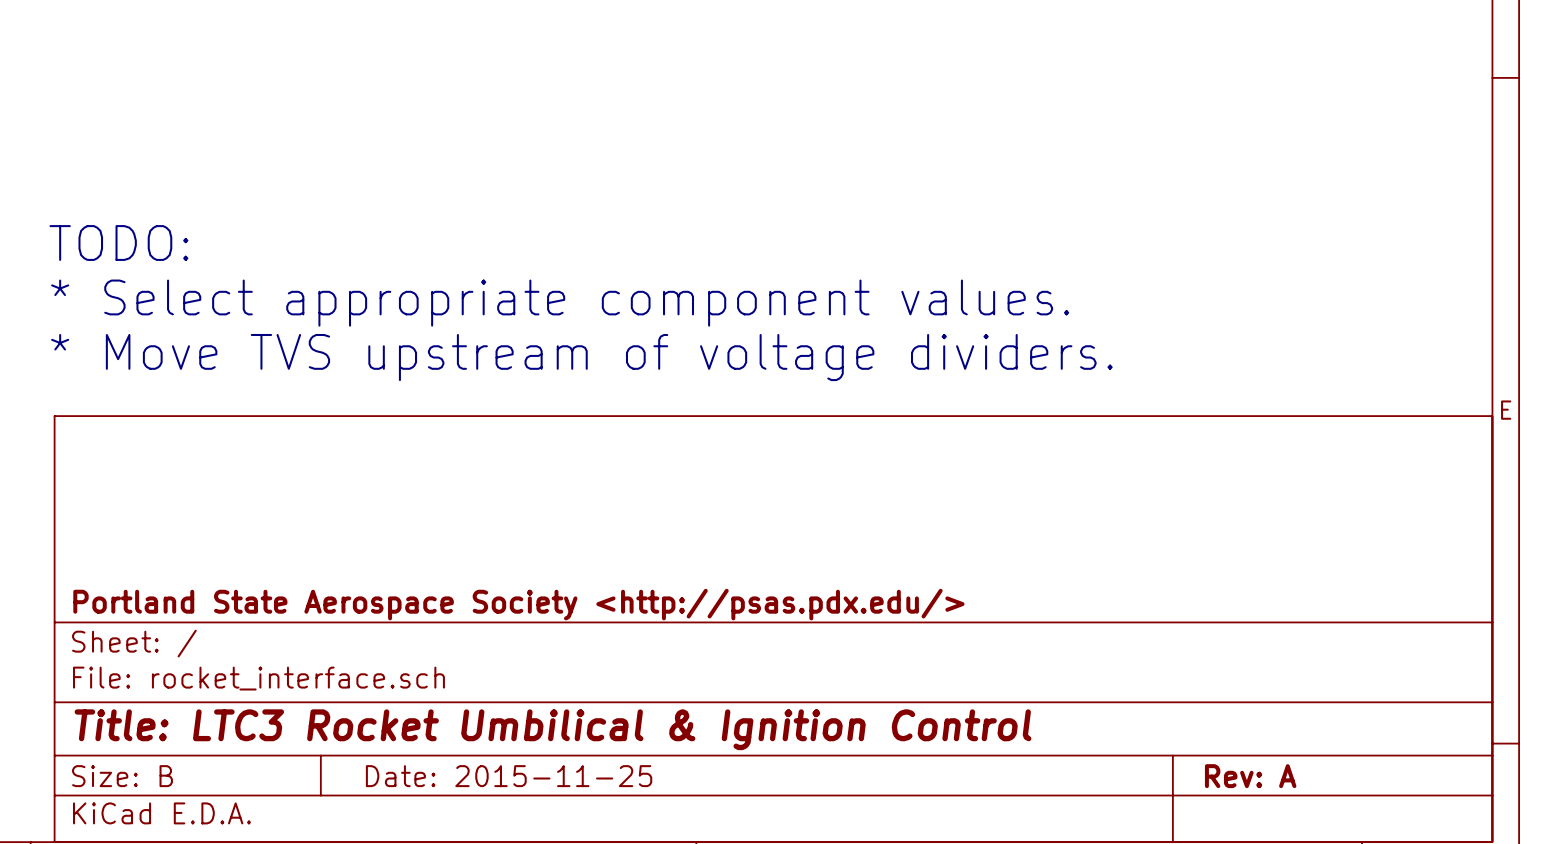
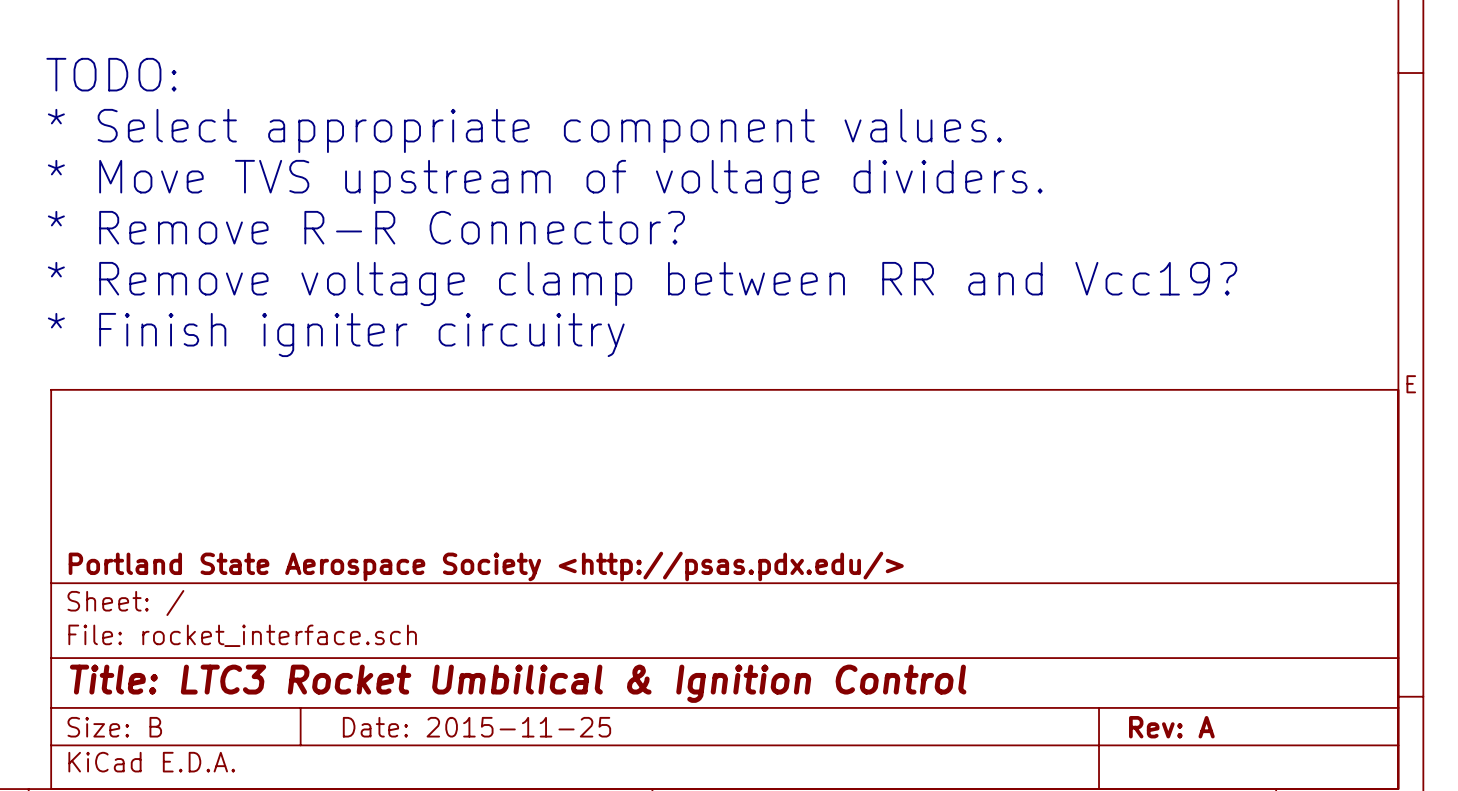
text: none -> TODO: (111, 74)
text: none -> * Select appropriate component values. (524, 130)
text: none -> * Move TVS upstream of voltage dividers. (545, 181)
text: TODO: (118, 243) -> * Remove R-R Connector? (366, 227)
text: * Select appropriate component values. (560, 303) -> * Remove voltage clamp between RR and Vcc19? (642, 283)
text: * Move TVS upstream of voltage dividers. (581, 357) -> * Finish igniter circuitry (336, 335)

